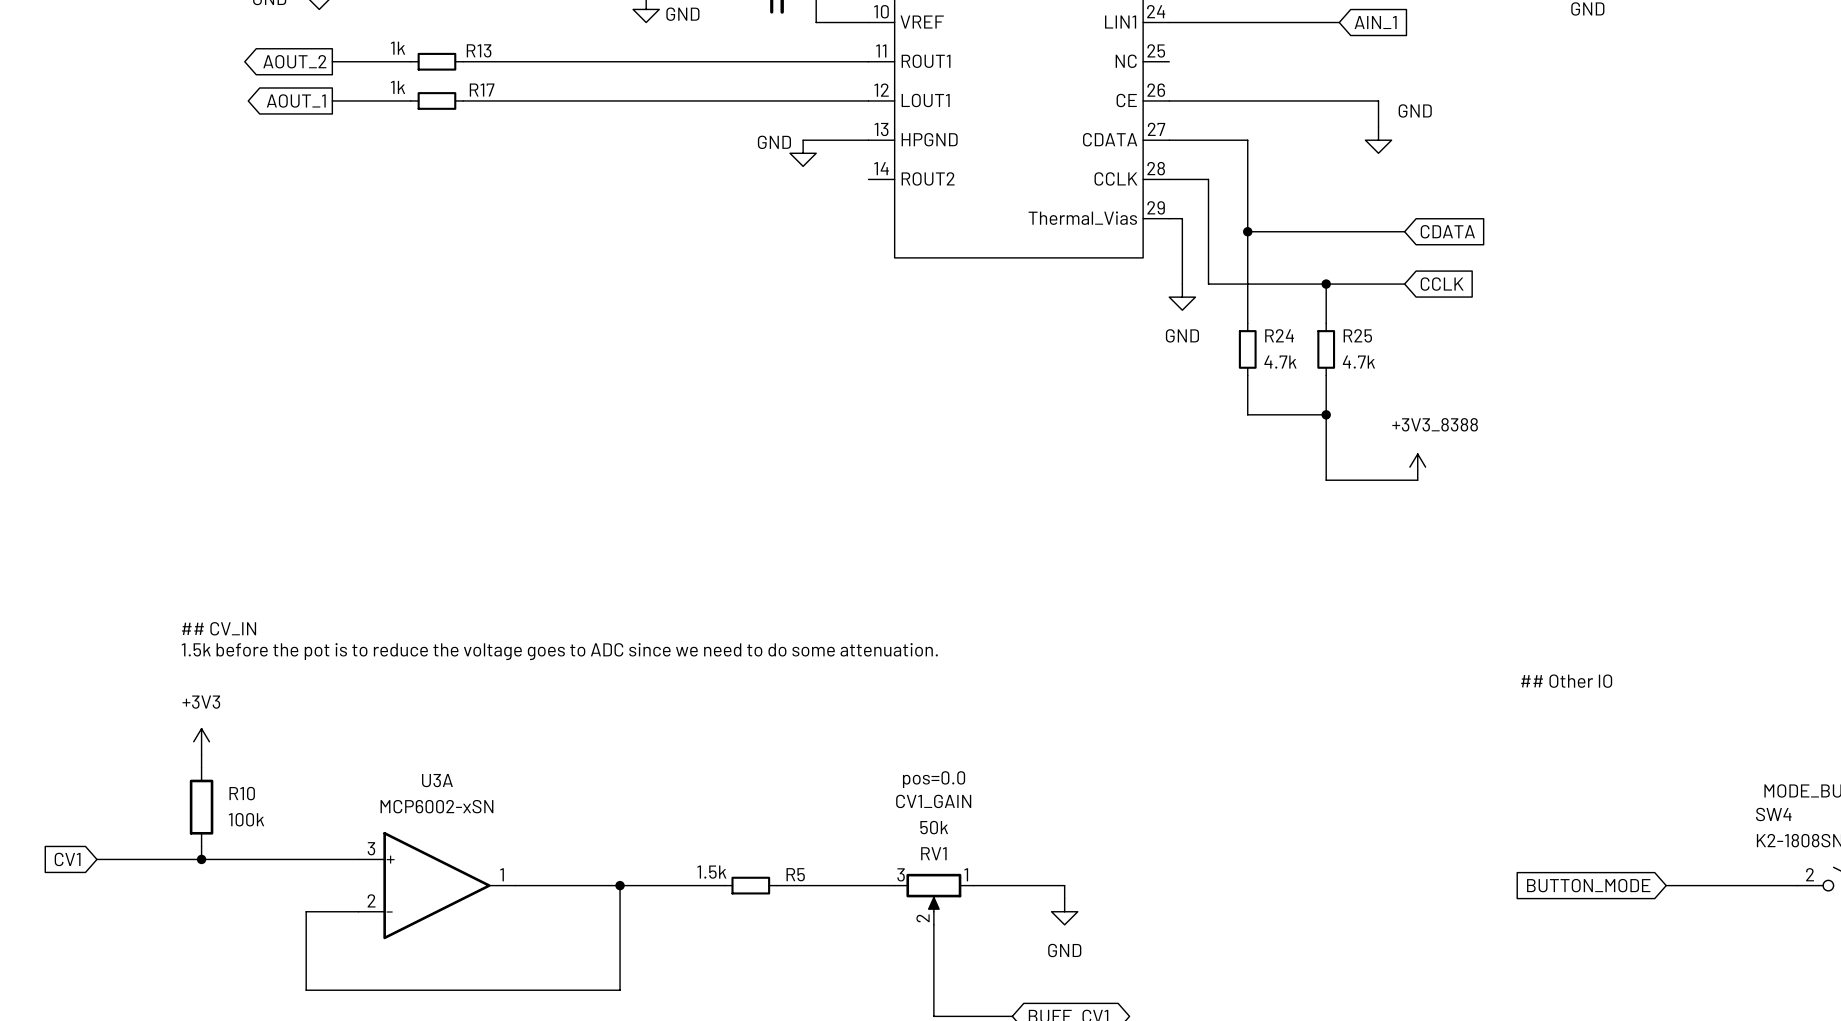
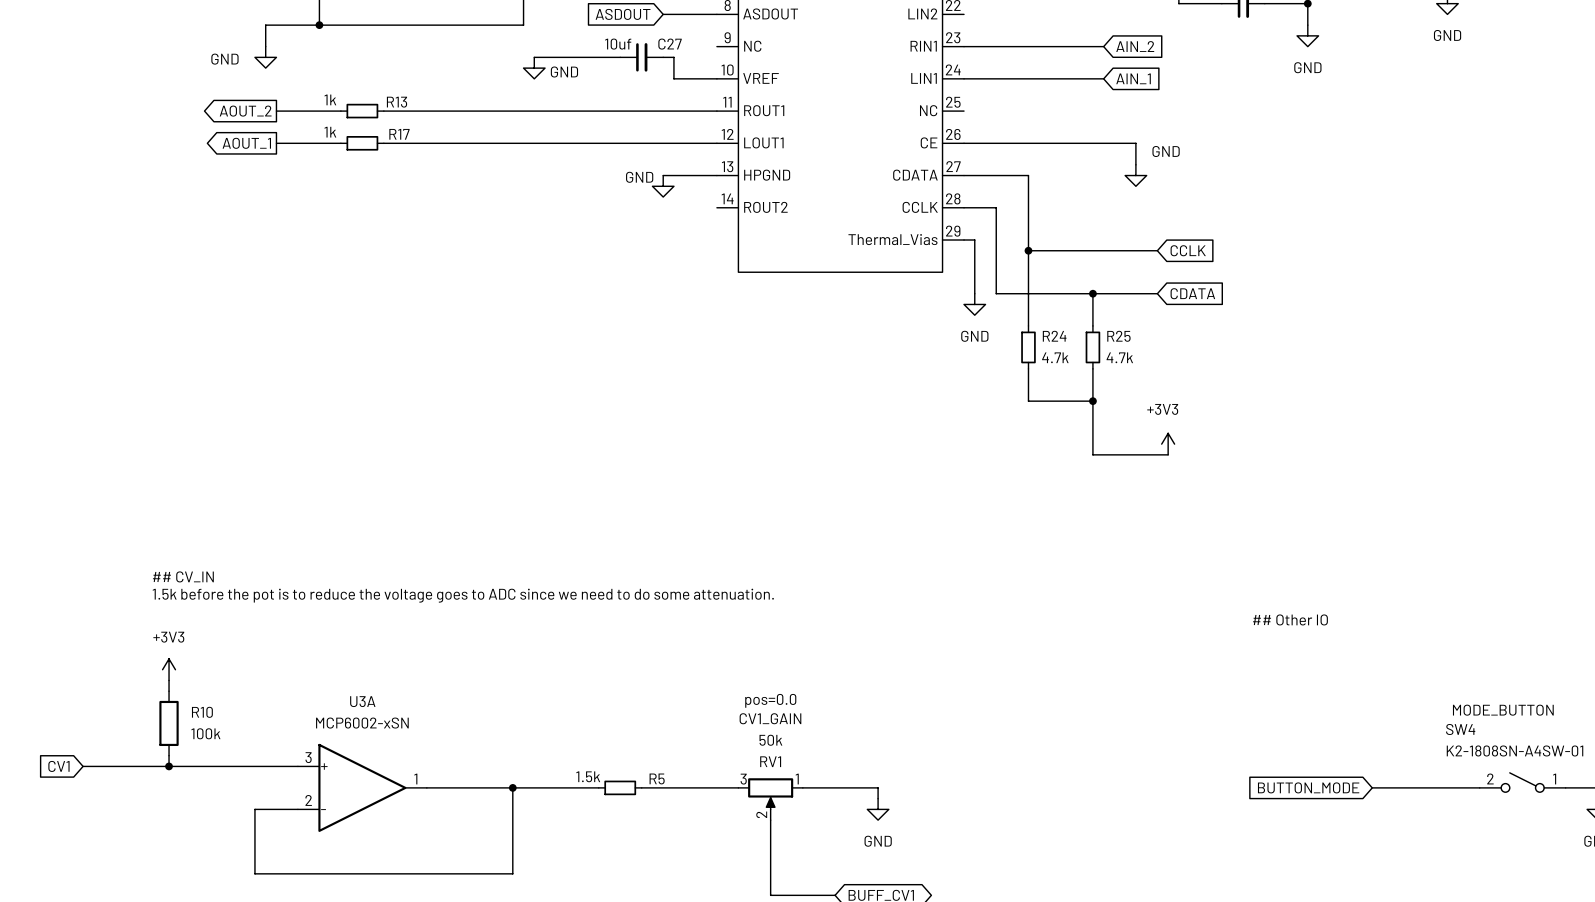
global label: CDATA (1447, 231) -> CCLK (1188, 250)
global label: CCLK (1442, 284) -> CDATA (1192, 293)
power symbol: +3V3_8388 (1417, 467) -> +3V3 (1168, 444)

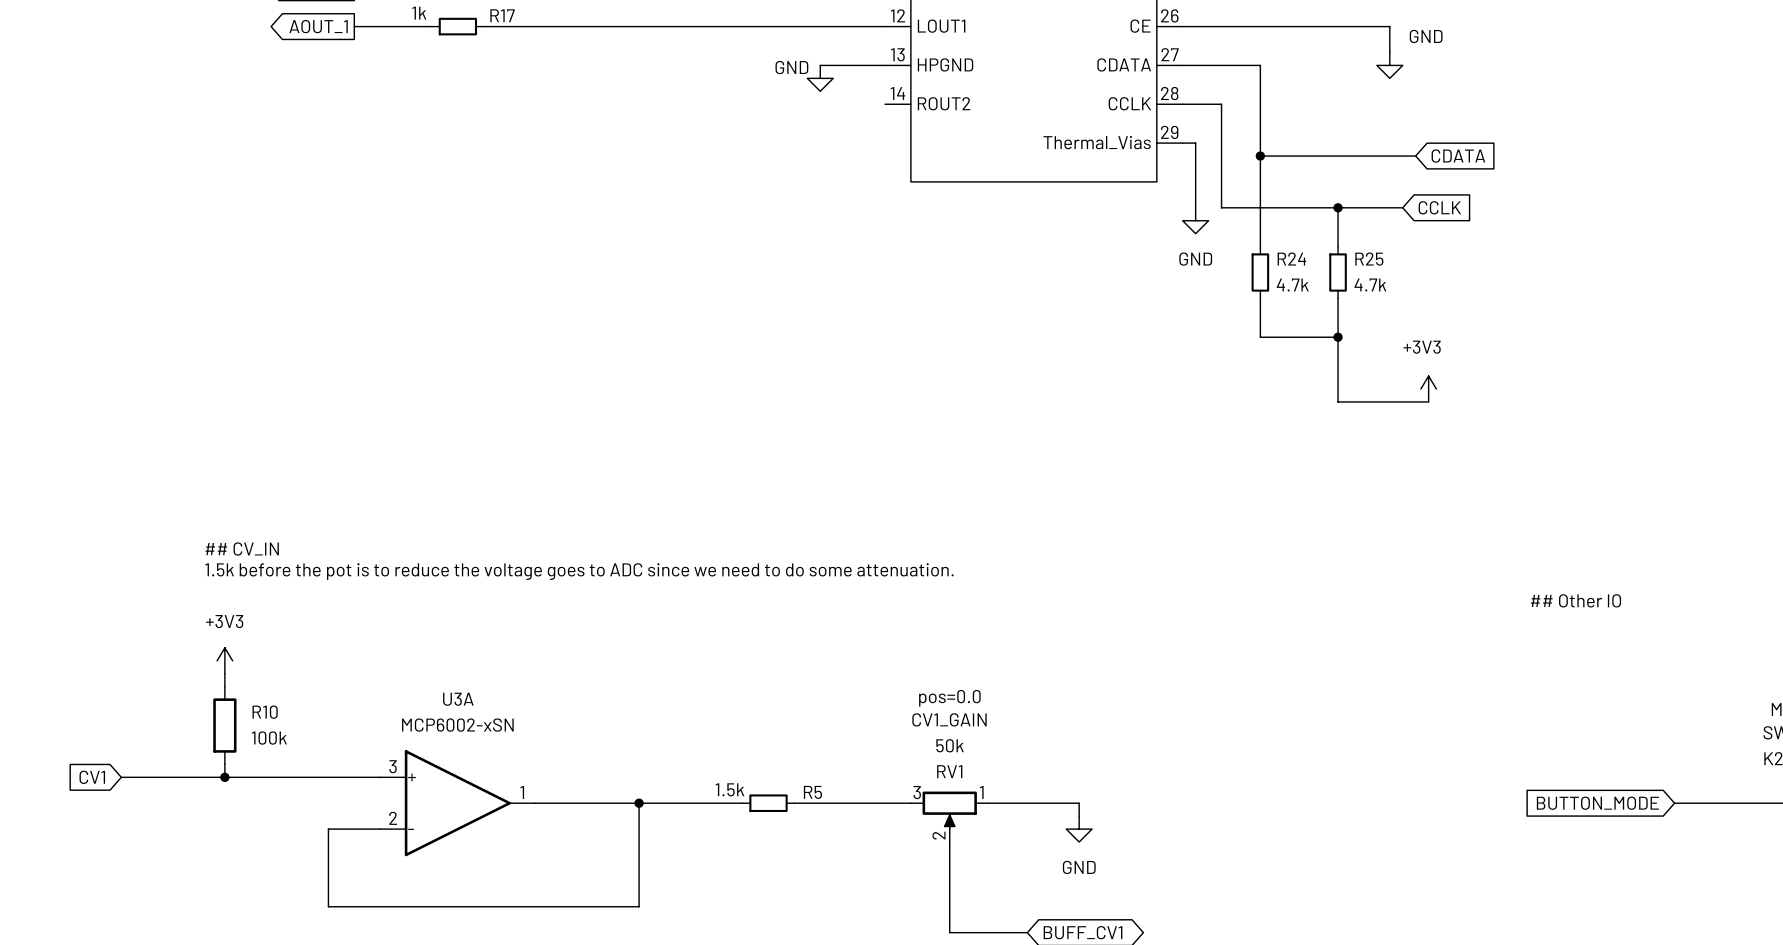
global label: CCLK (1188, 250) -> CDATA (1458, 156)
wire: (1146, 293) (1157, 293) -> none
global label: none -> CCLK (1439, 207)
global label: CDATA (1192, 293) -> none

